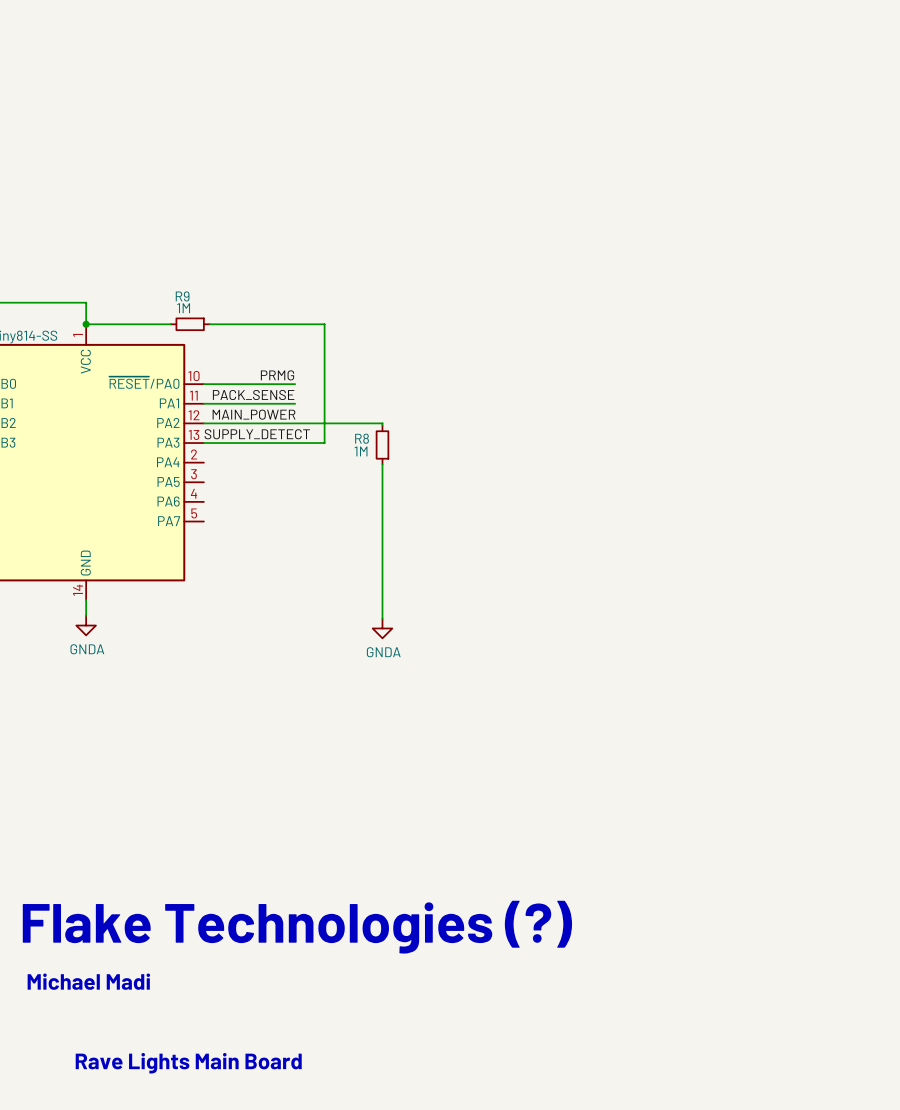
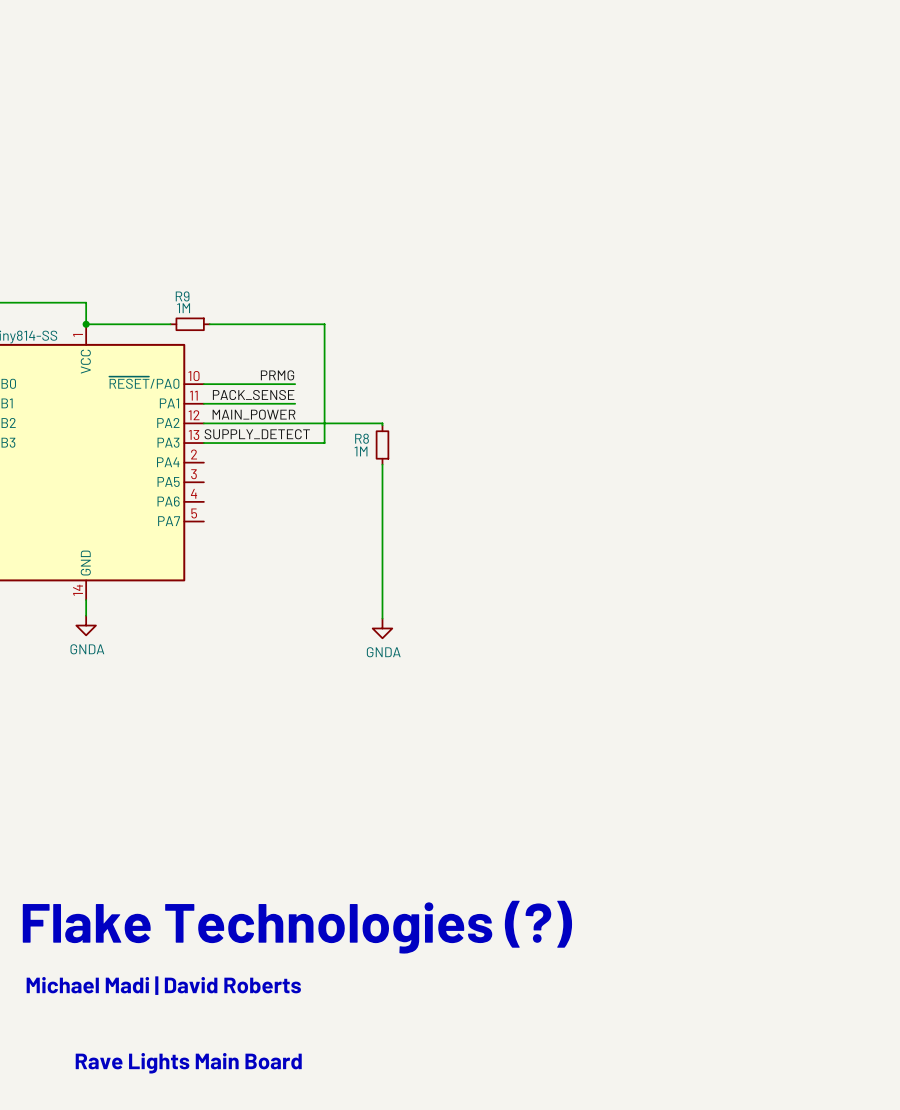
text: Michael Madi (88, 981) -> Michael Madi | David Roberts (163, 985)

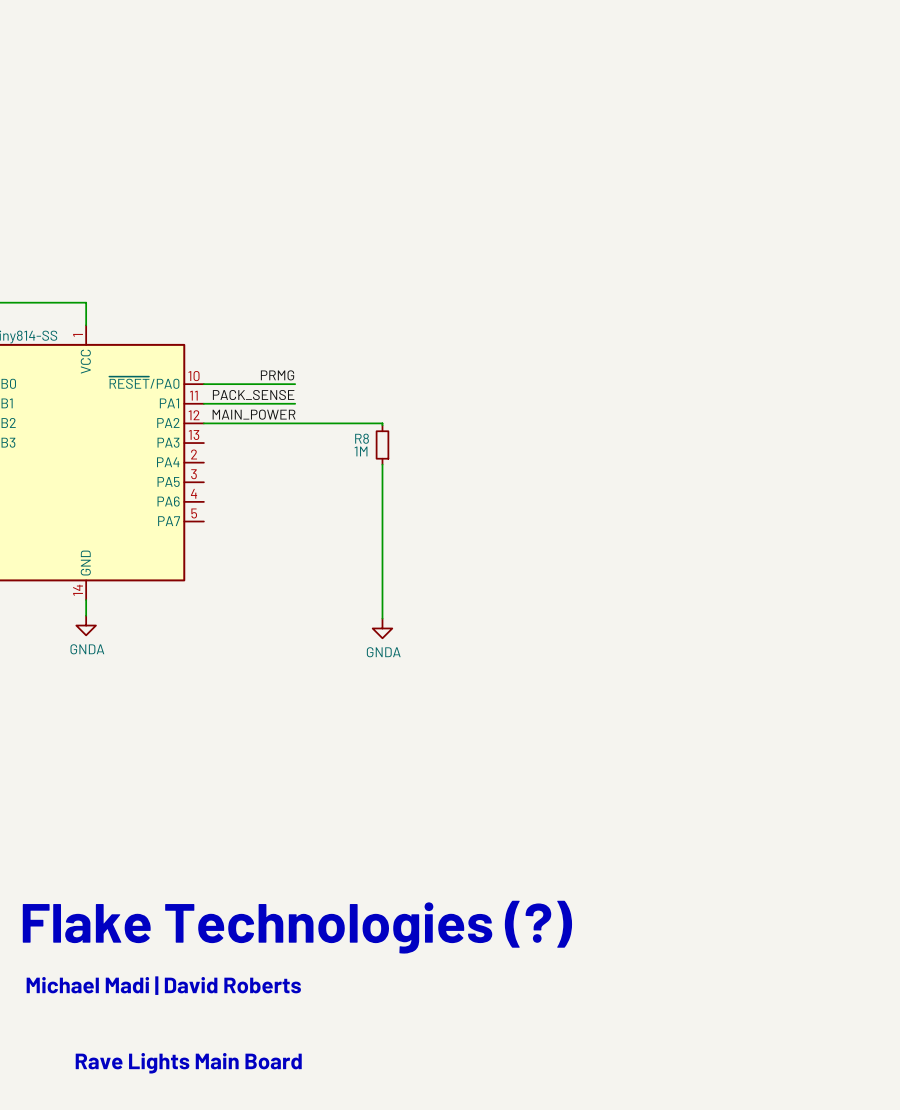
wire: (86, 324) (170, 324) -> none
junction: (86, 324) -> none
R9: 1M (190, 324) -> none
wire: (209, 324) (324, 324) (324, 443) (203, 443) -> none
label: SUPPLY_DETECT (257, 434) -> none

